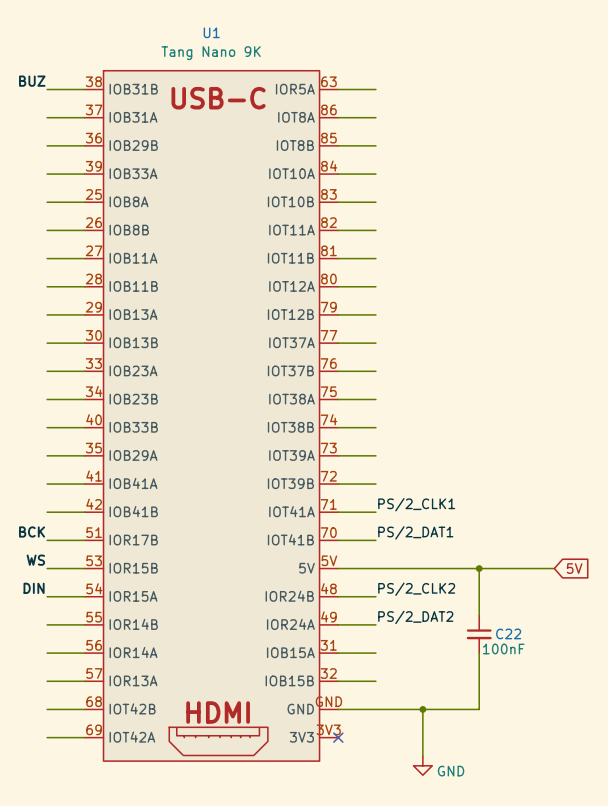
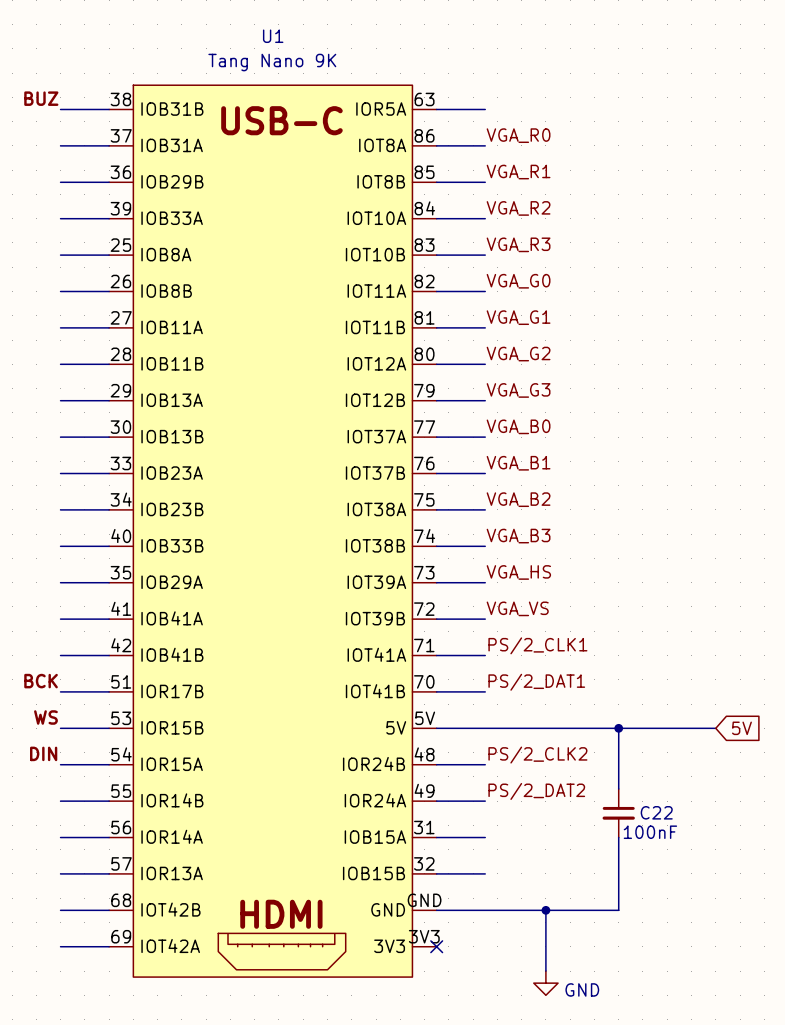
label: none -> VGA_R0 (518, 135)
label: none -> VGA_R1 (518, 172)
label: none -> VGA_R2 (518, 208)
label: none -> VGA_R3 (518, 244)
label: none -> VGA_G0 (518, 281)
label: none -> VGA_G1 (518, 317)
label: none -> VGA_G2 (518, 354)
label: none -> VGA_G3 (518, 390)
label: none -> VGA_B0 (518, 426)
label: none -> VGA_B1 (518, 463)
label: none -> VGA_B2 (518, 499)
label: none -> VGA_B3 (518, 536)
label: none -> VGA_HS (518, 572)
label: none -> VGA_VS (517, 608)

